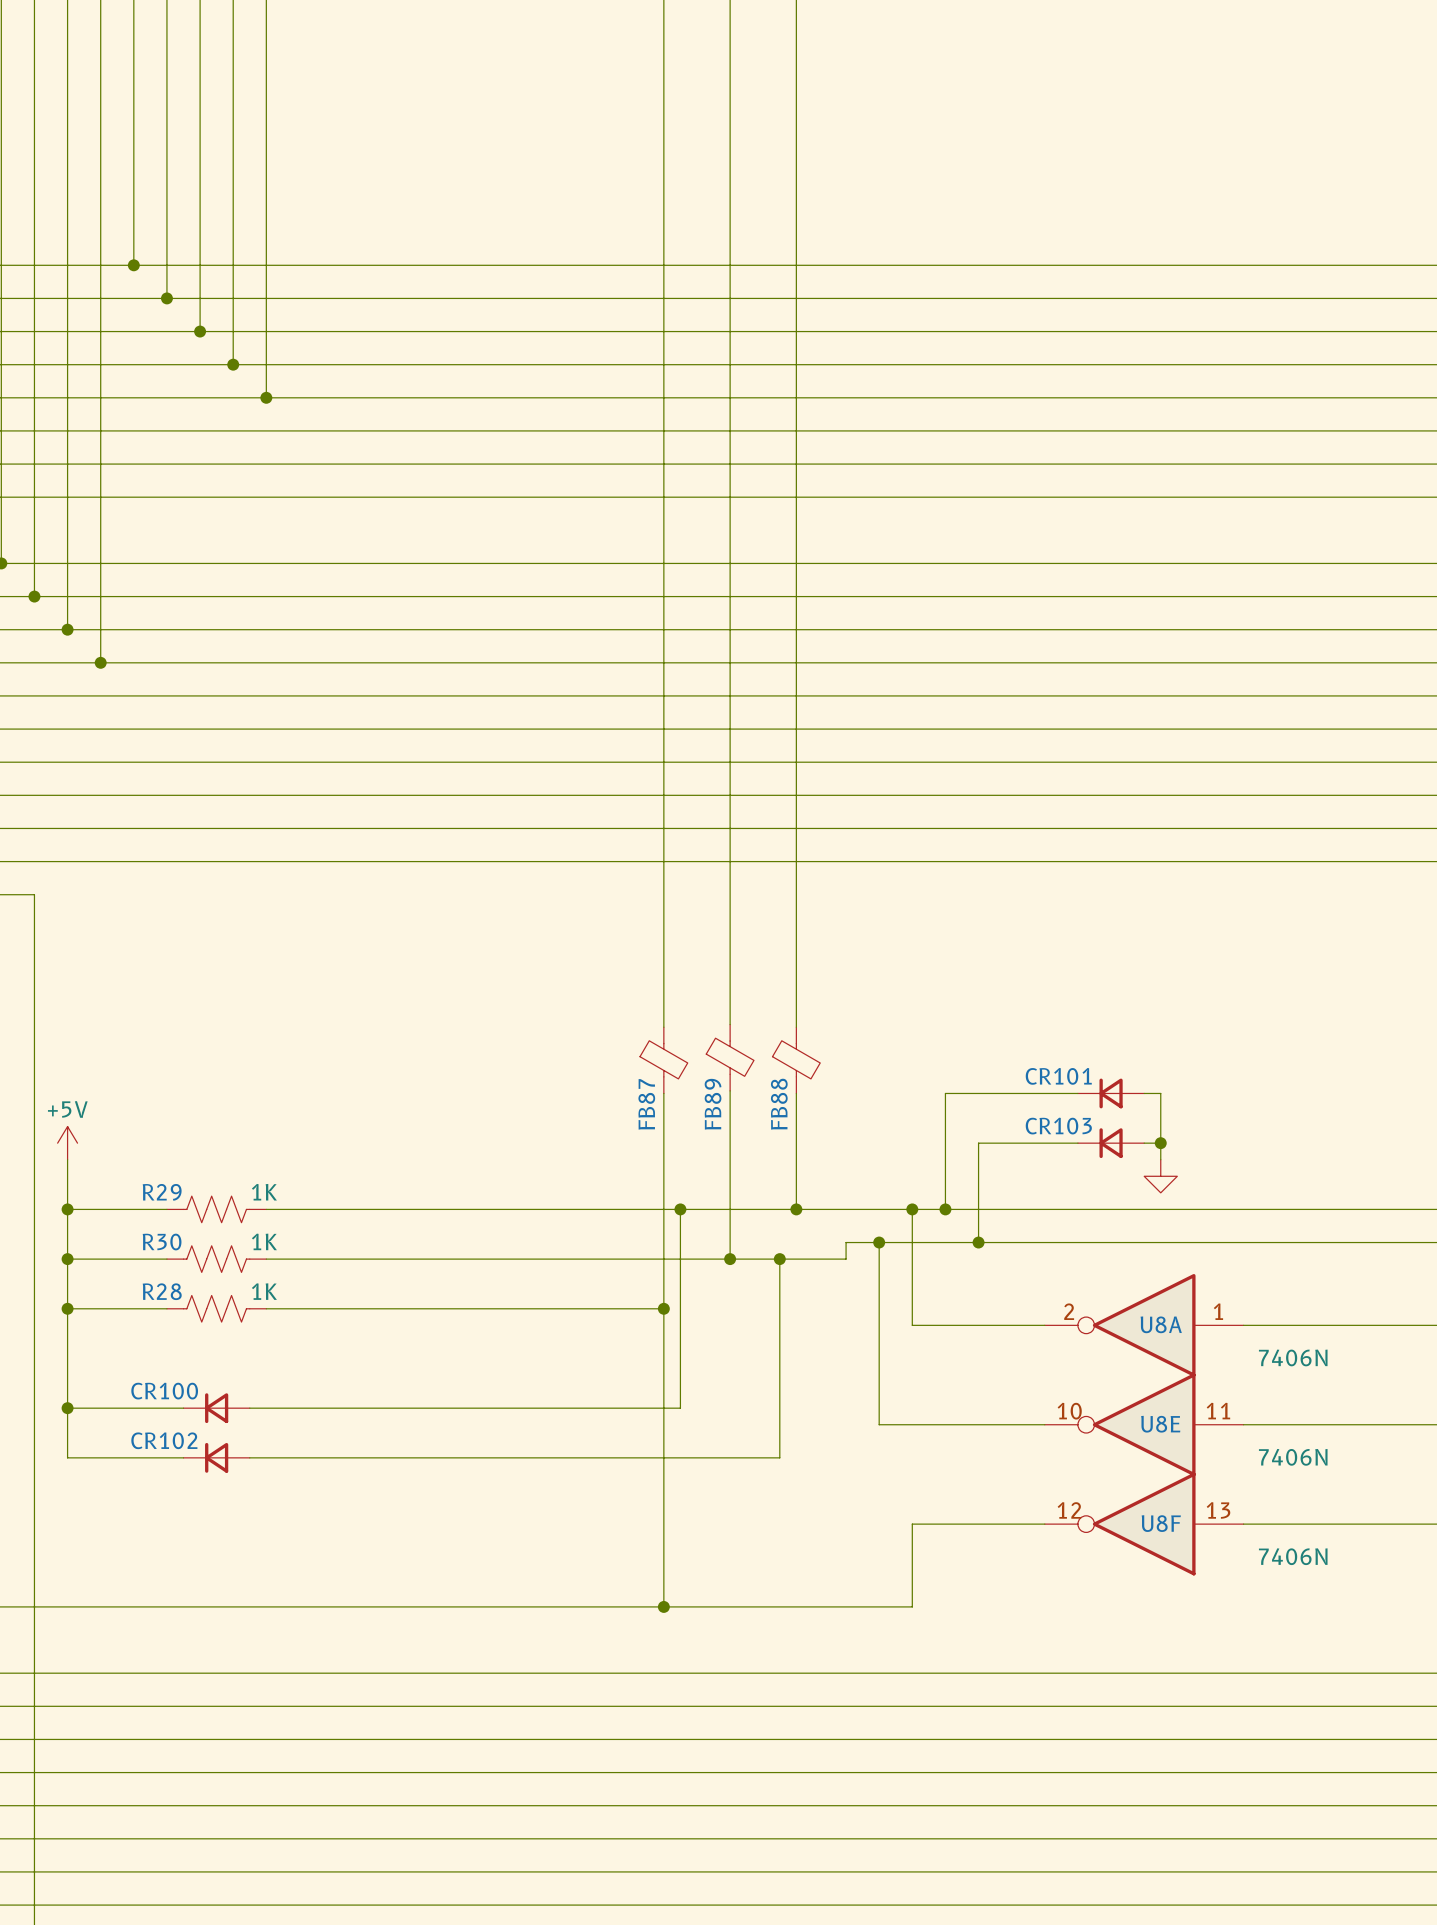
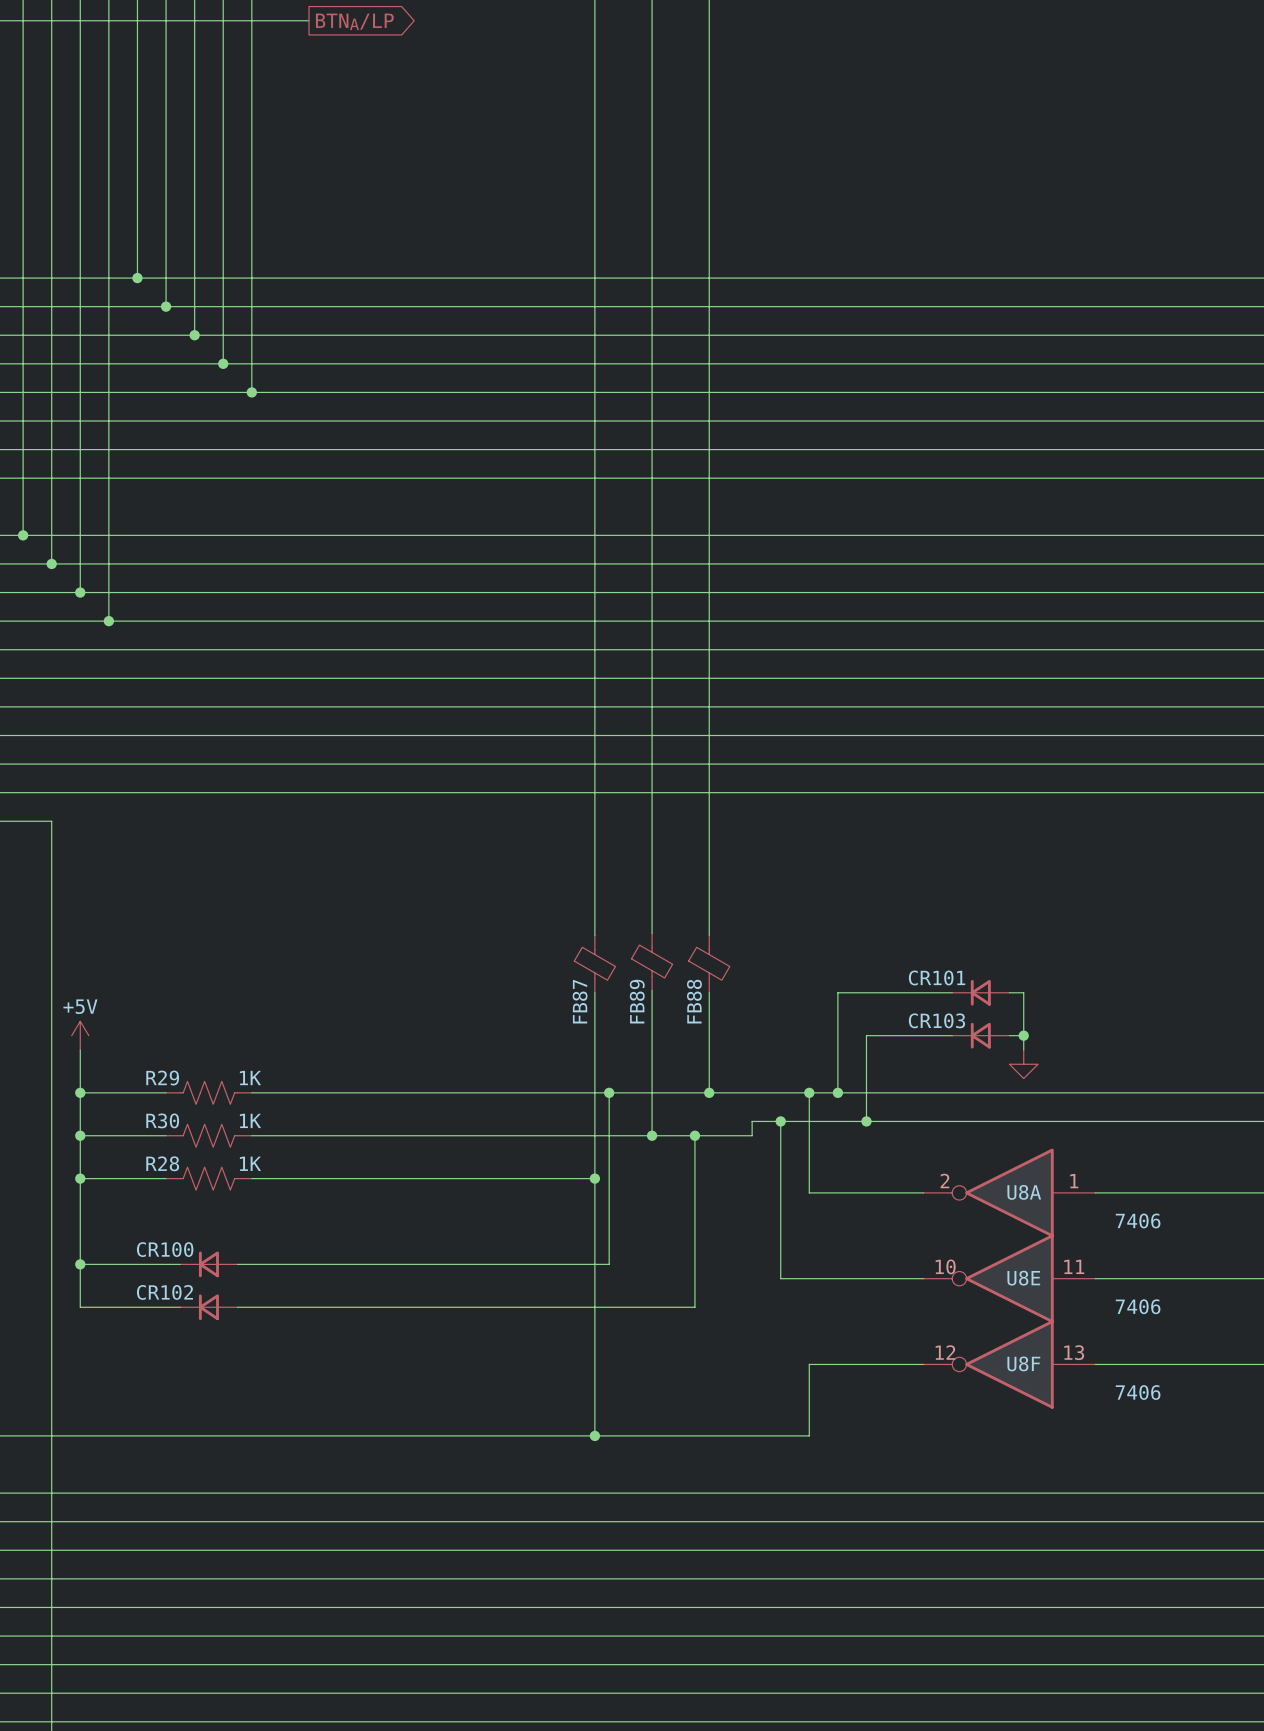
U8A value: 7406N (1293, 1357) -> 7406 (1138, 1220)
U8E value: 7406N (1293, 1457) -> 7406 (1138, 1306)
U8F value: 7406N (1293, 1556) -> 7406 (1138, 1392)

